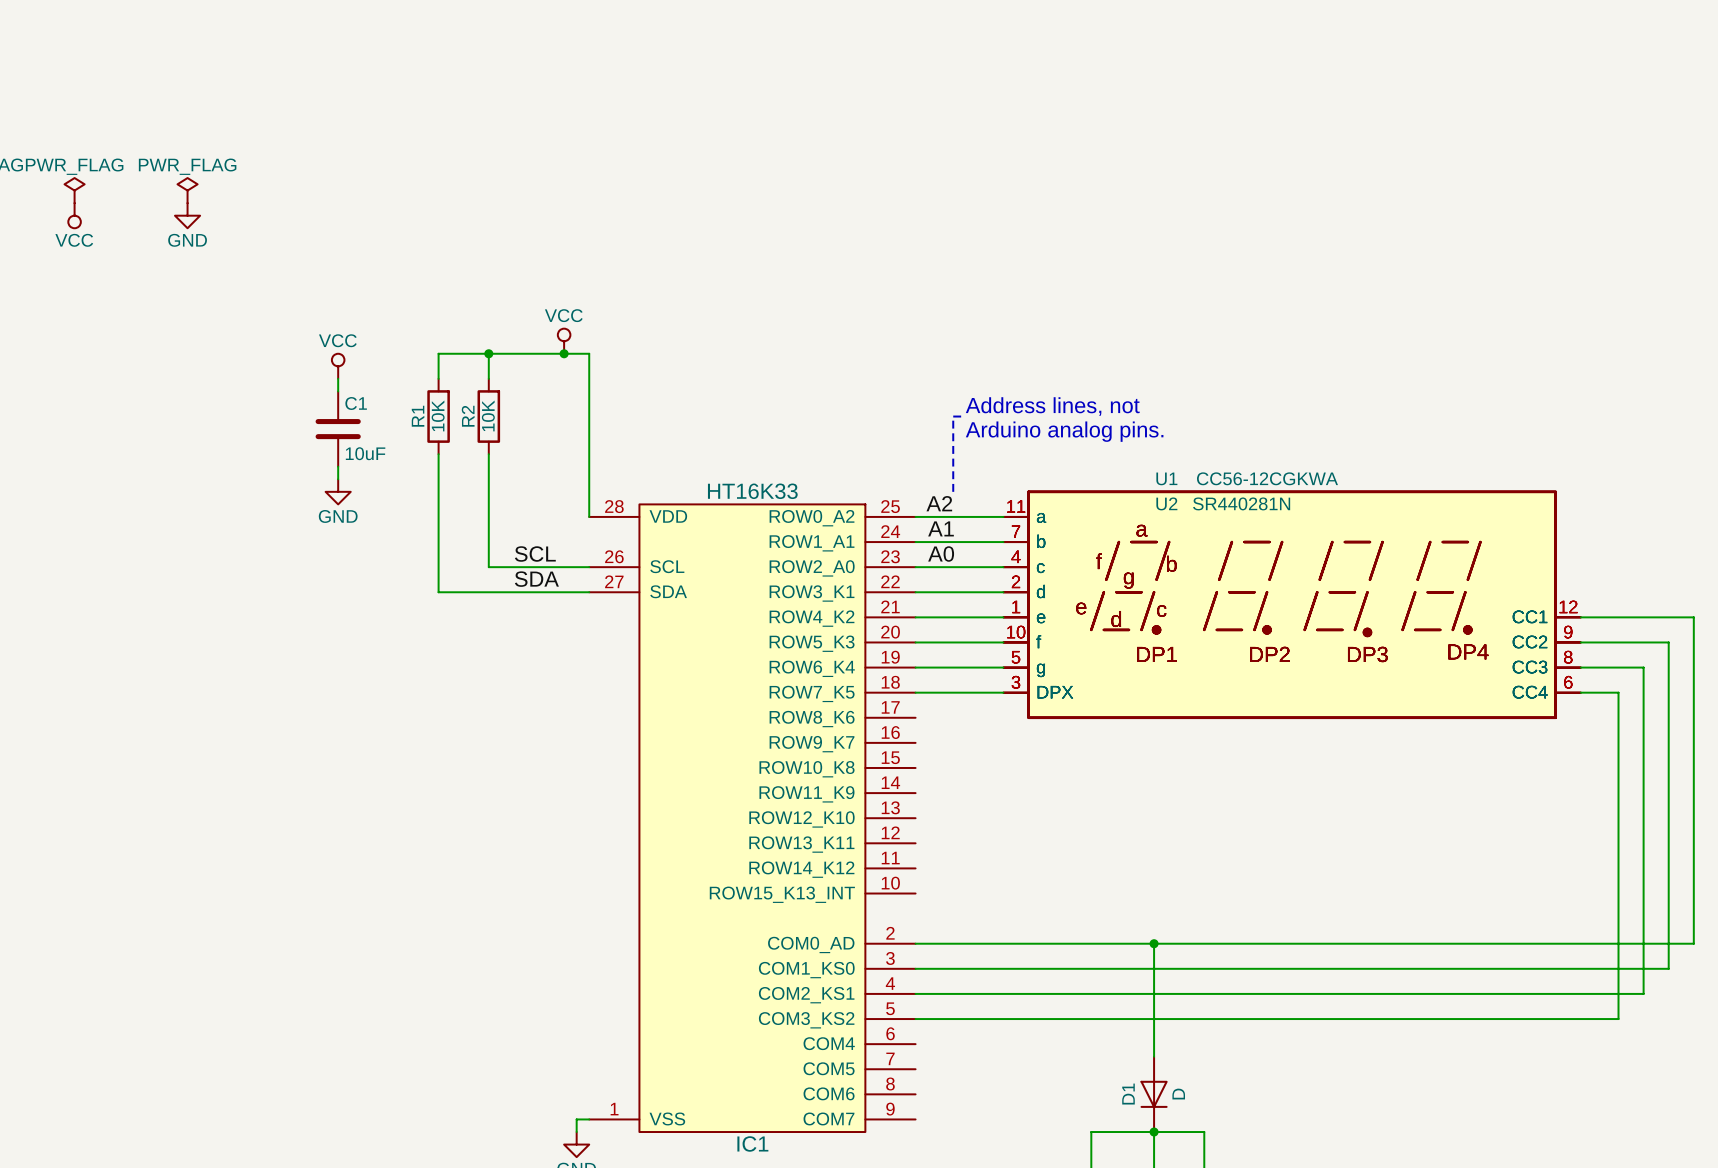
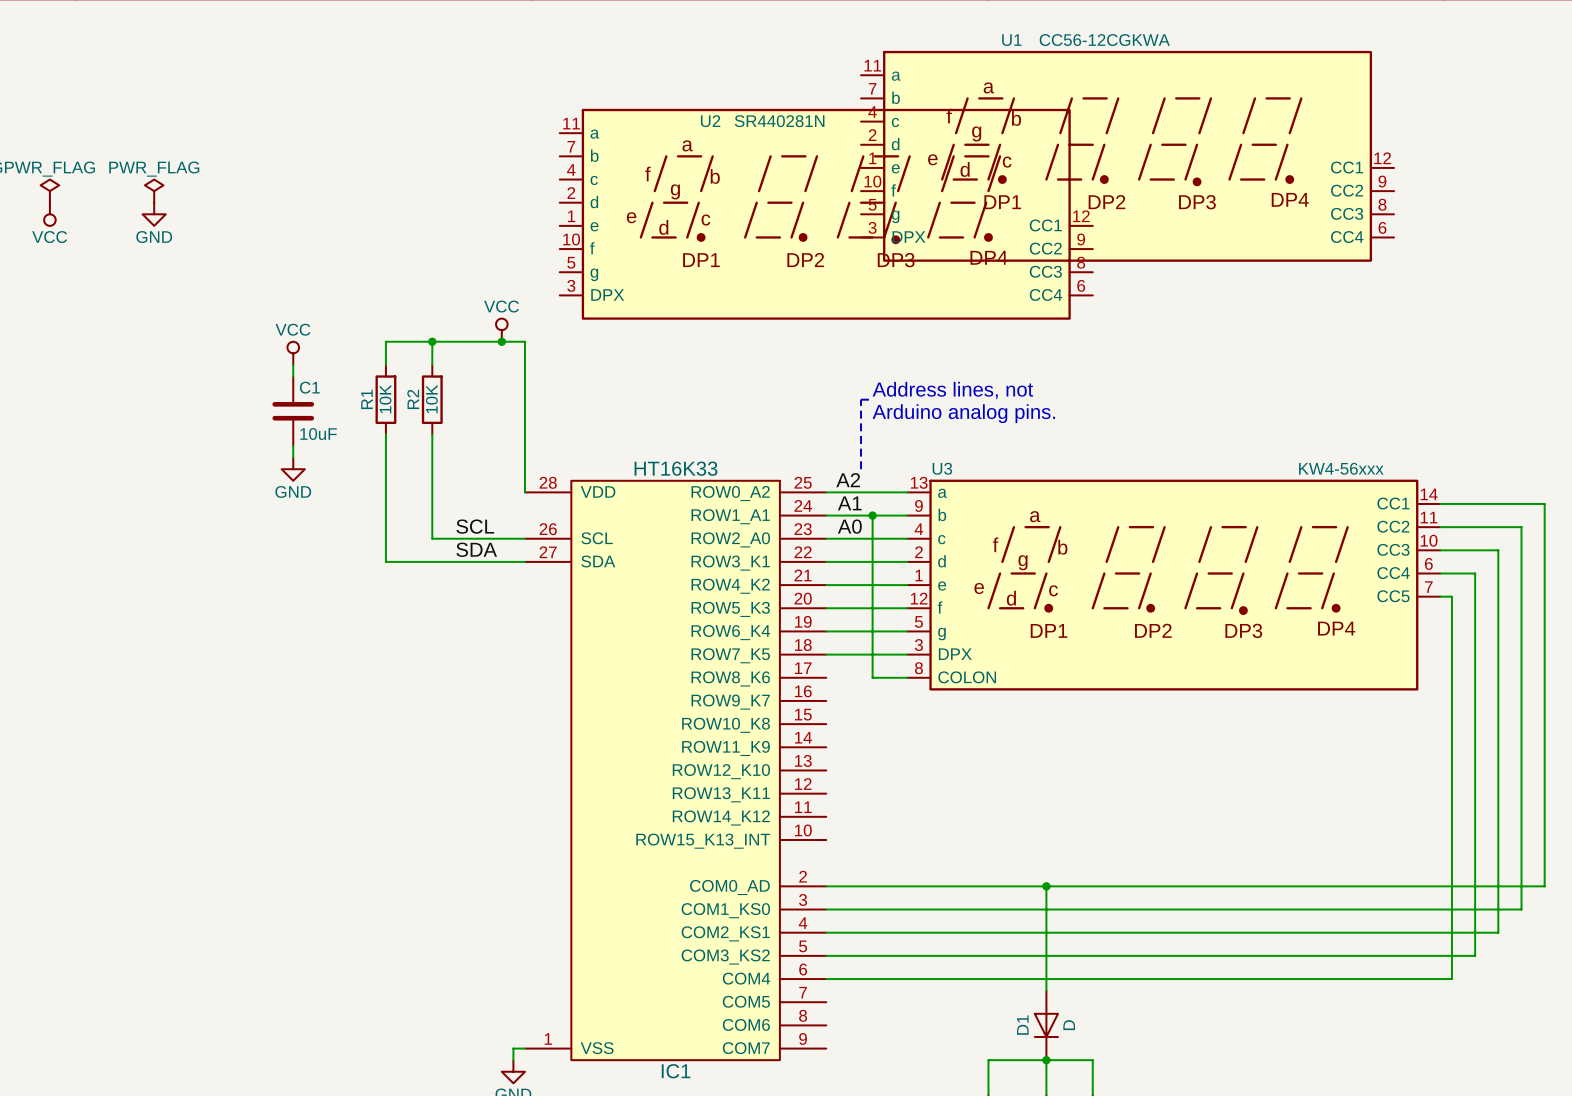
wire: none -> (872, 515) (872, 677) (907, 677)
junction: none -> (872, 515)
U1 position: (1292, 604) -> (1127, 156)
U2 position: (1292, 604) -> (826, 214)
U3: none -> KW4-56xxx (1173, 585)
wire: (1580, 617) (1693, 617) -> (1440, 503) (1544, 503) (1544, 585)
wire: none -> (1440, 596) (1451, 596) (1451, 979) (826, 979)
wire: (1580, 642) (1668, 642) -> (1440, 527) (1521, 527) (1521, 608)
wire: (1580, 667) (1643, 667) -> (1440, 550) (1498, 550) (1498, 631)
wire: (1580, 692) (1618, 692) -> (1440, 573) (1475, 573) (1475, 654)

